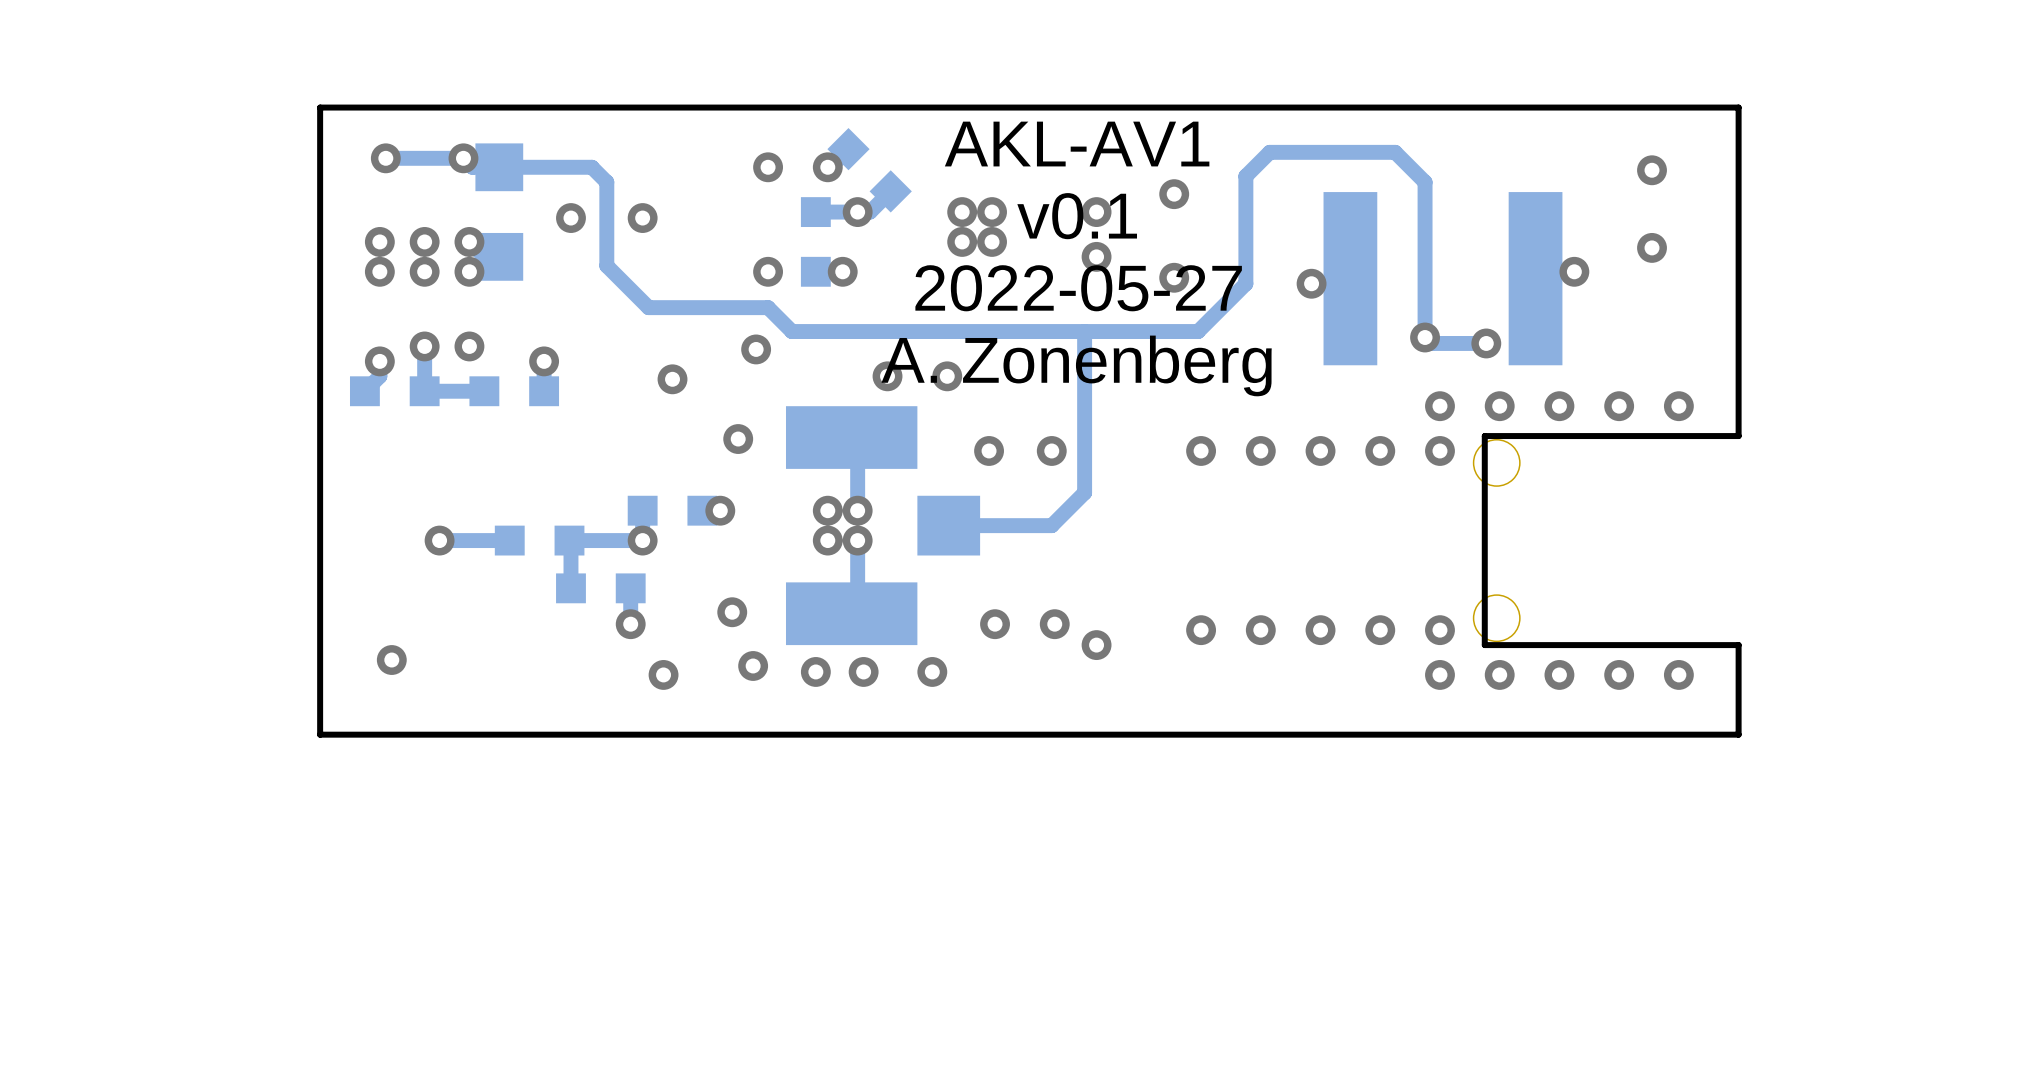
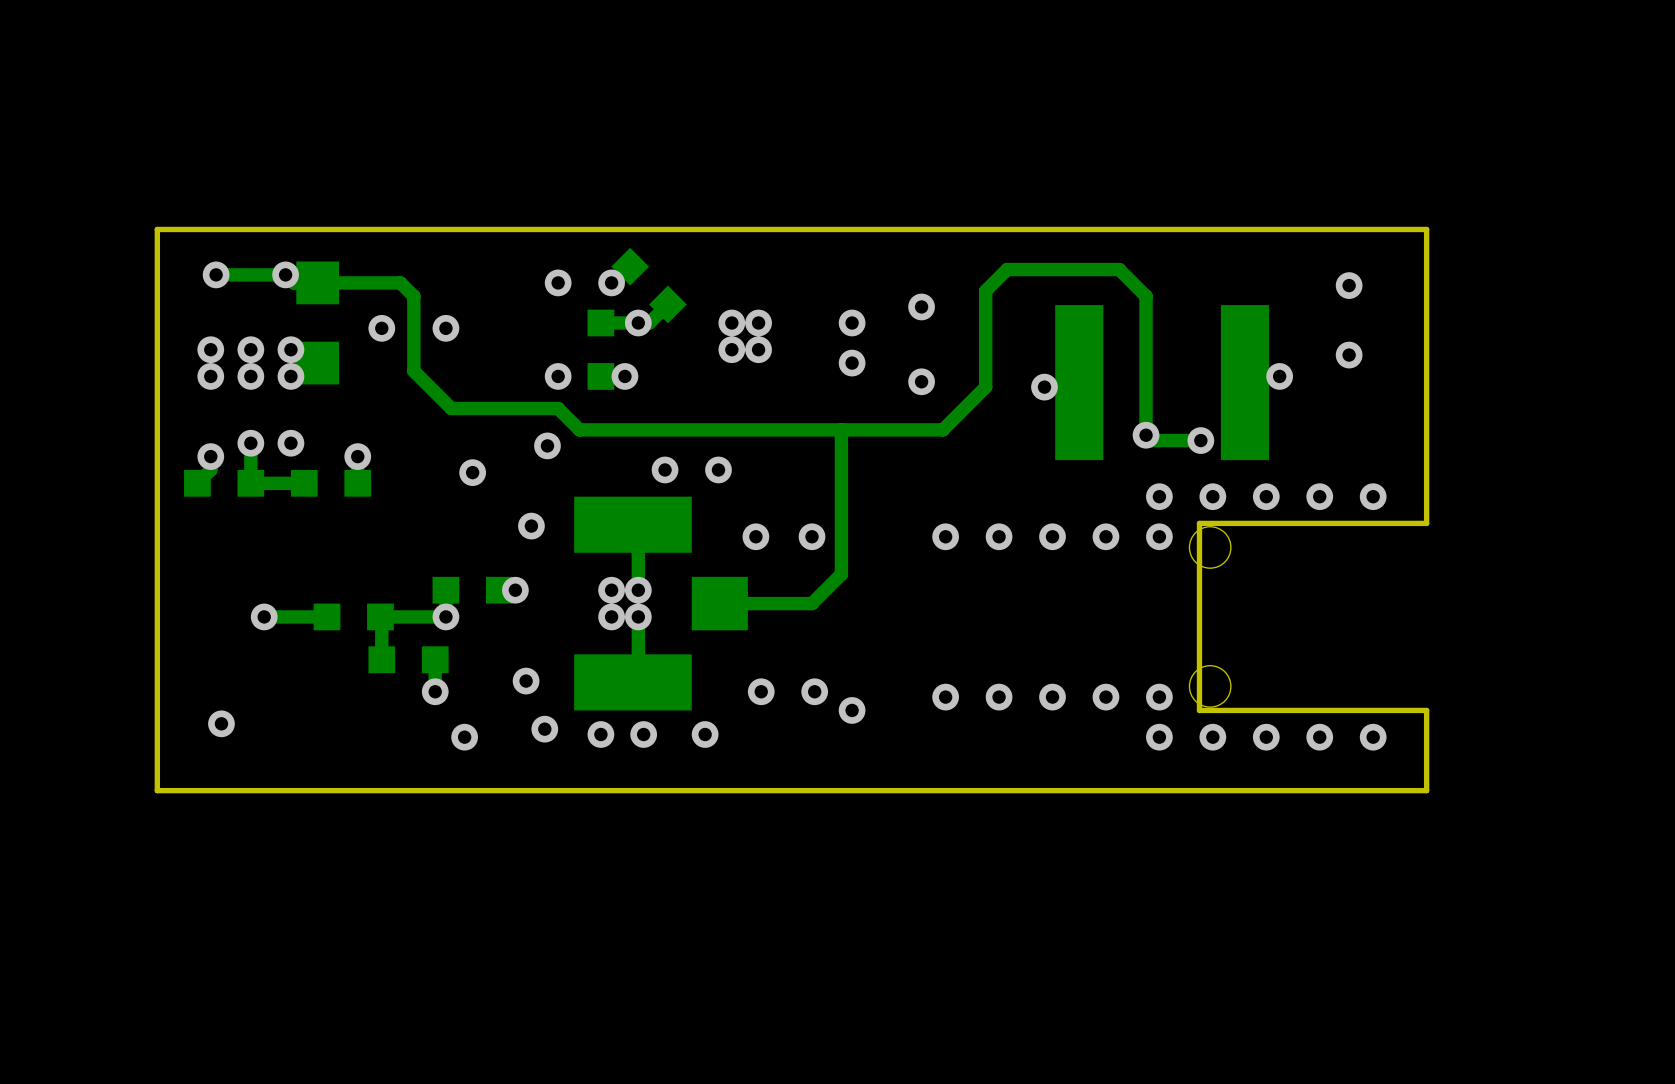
text: AKL-AV1 (1077, 144) -> none
text: v0.1 (1077, 216) -> none
text: 2022-05-27 (1078, 288) -> none
text: A. Zonenberg (1076, 365) -> none

